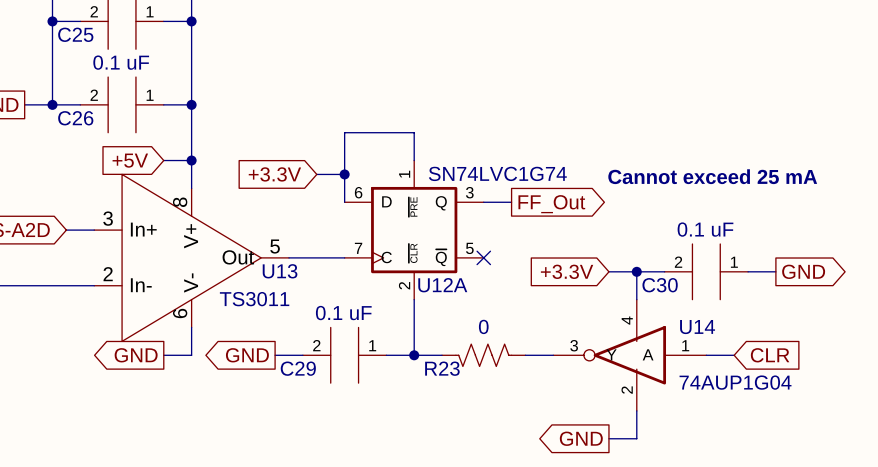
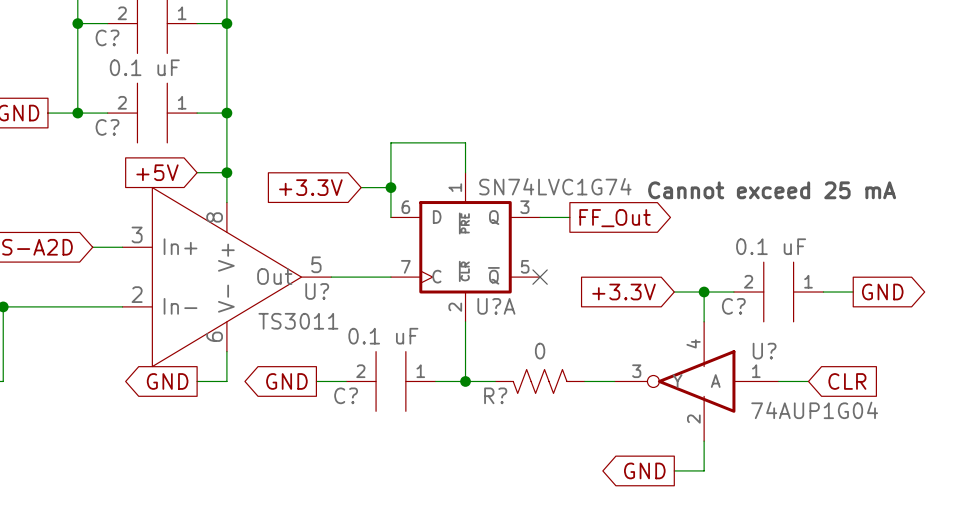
C25 name: C25 (75, 34) -> C? (107, 37)
C26 name: C26 (75, 118) -> C? (107, 127)
U13 name: U13 (280, 271) -> U? (317, 291)
U12A name: U12A (442, 285) -> U?A (496, 306)
C30 name: C30 (660, 285) -> C? (733, 306)
U14 name: U14 (697, 327) -> U? (764, 351)
C29 name: C29 (298, 368) -> C? (346, 395)
R23 name: R23 (442, 368) -> R? (495, 395)

